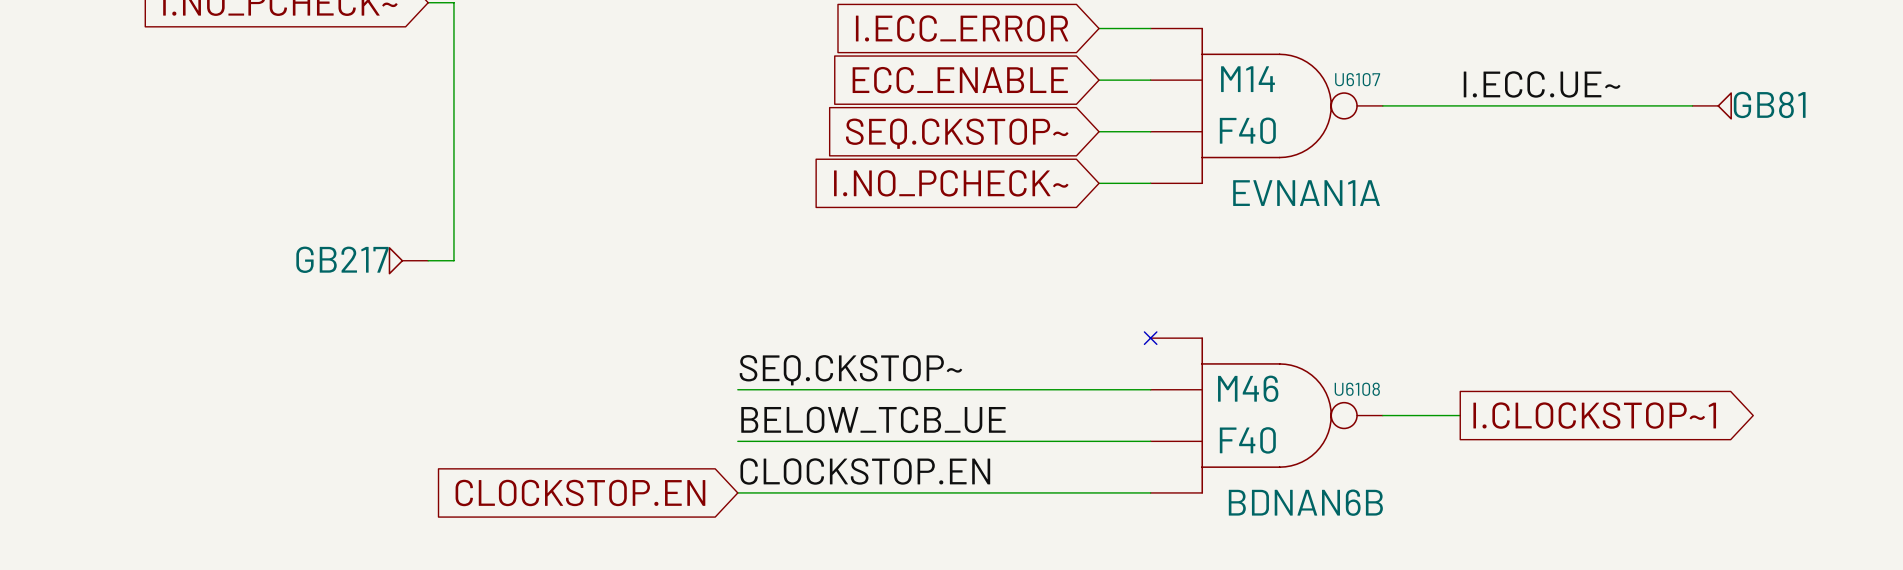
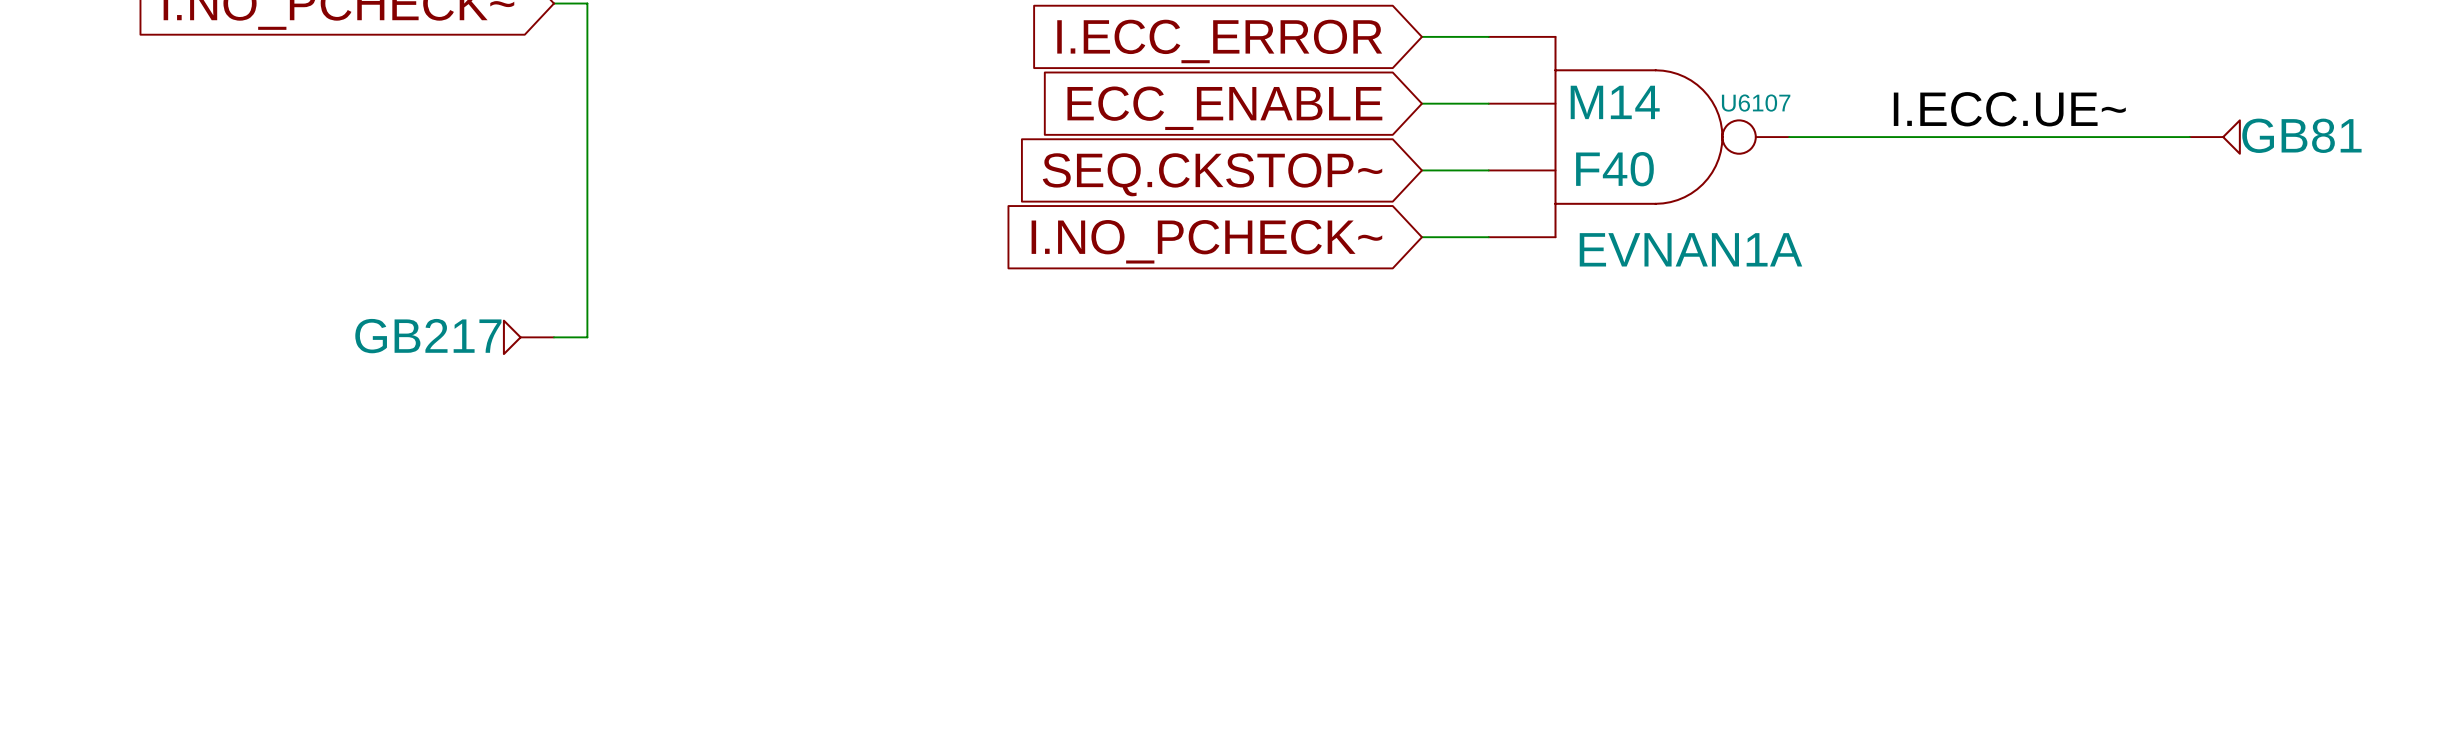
no-connect mark: (1150, 338) -> none
label: SEQ.CKSTOP~ (851, 370) -> none
wire: (737, 389) (1150, 389) -> none
U6108: F40 (1266, 415) -> none
wire: (1382, 415) (1460, 415) -> none
global label: I.CLOCKSTOP~1 (1594, 415) -> none
label: BELOW_TCB_UE (873, 419) -> none
wire: (737, 441) (1150, 441) -> none
label: CLOCKSTOP.EN (865, 471) -> none
global label: CLOCKSTOP.EN (580, 492) -> none
wire: (737, 492) (1150, 492) -> none

